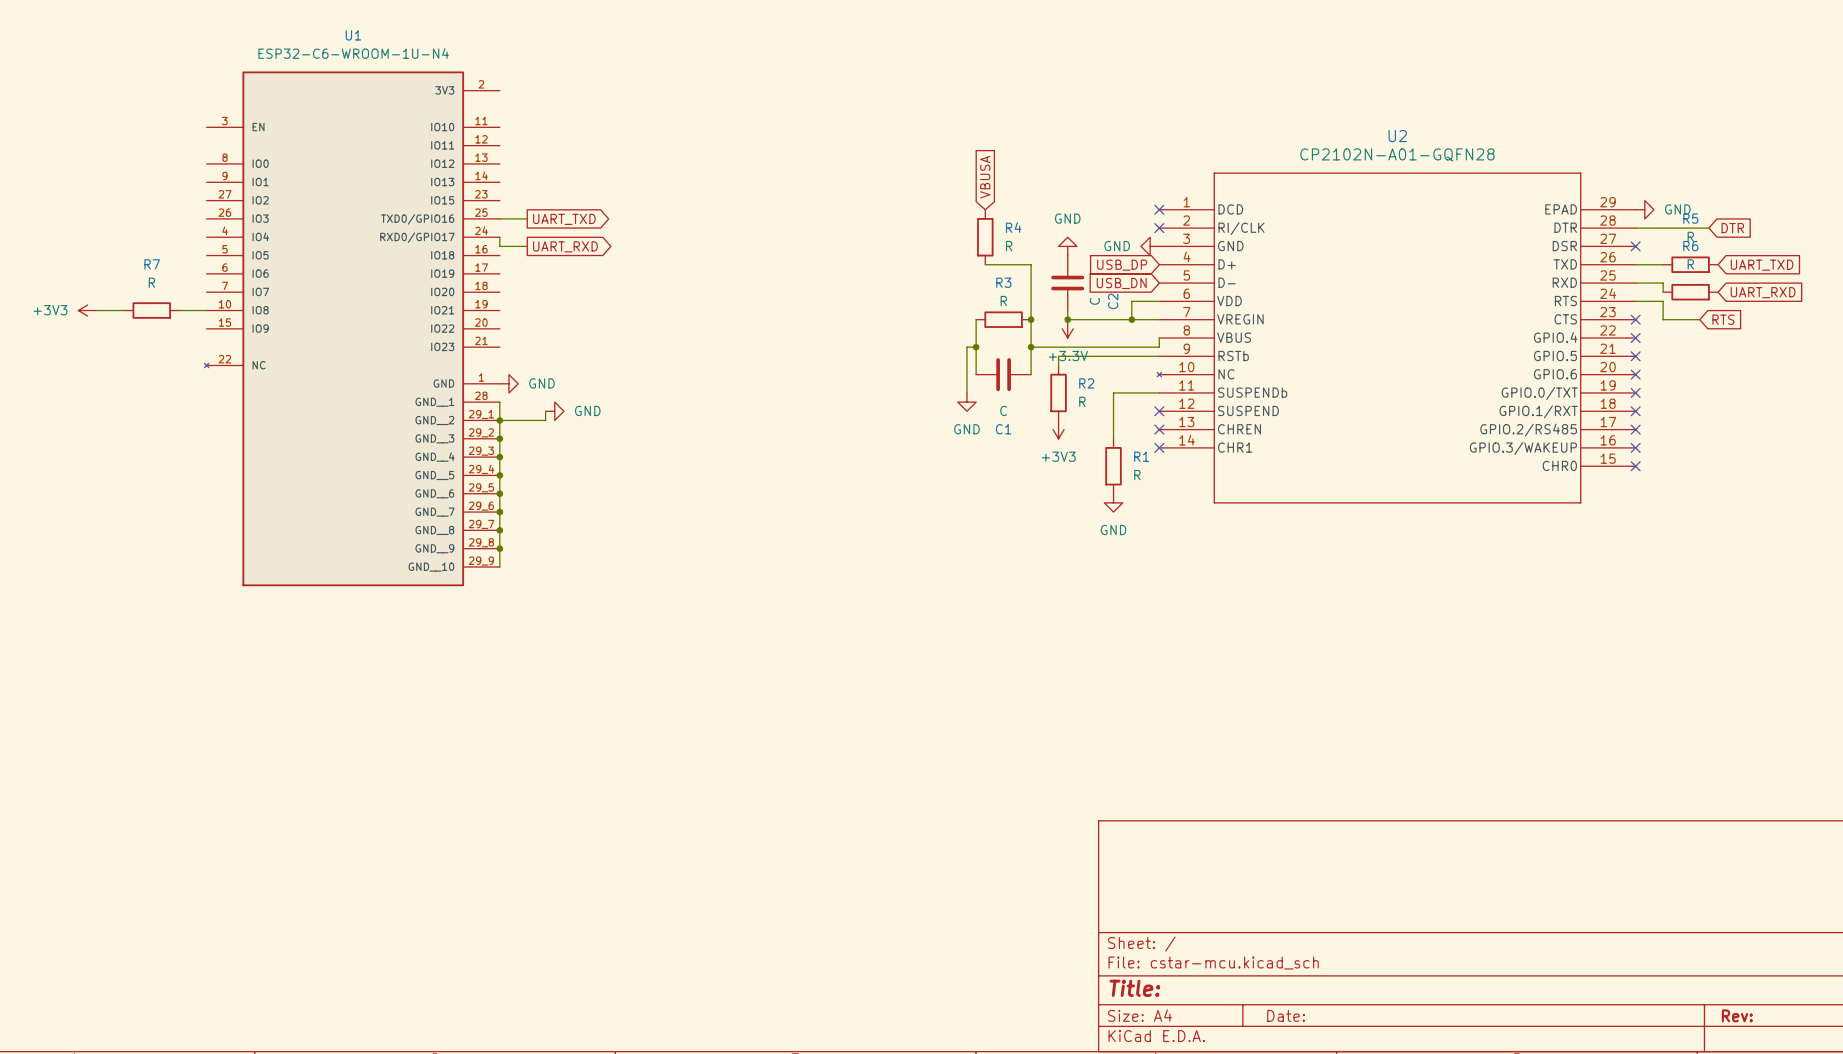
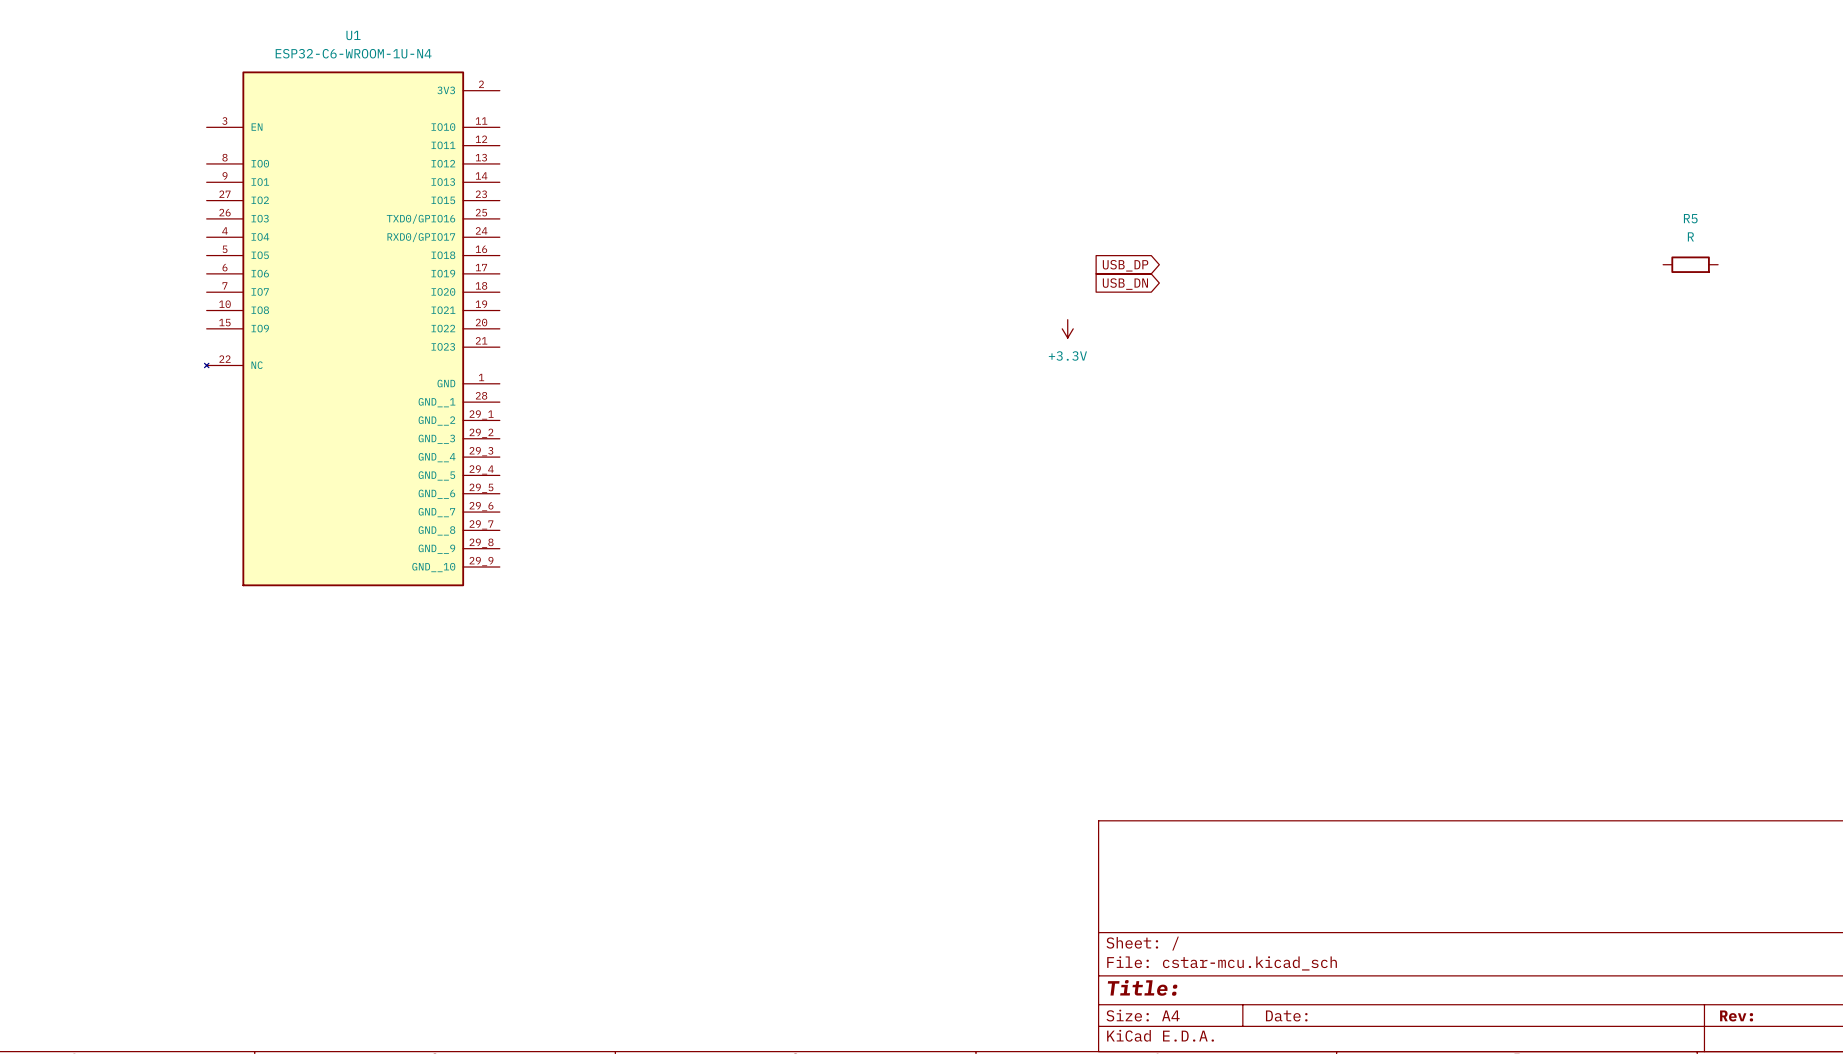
global label: VBUSA (985, 177) -> none
no-connect mark: (1159, 209) -> none
power symbol: GND (1644, 209) -> none
wire: (499, 218) (527, 218) -> none
global label: UART_TXD (564, 219) -> none
no-connect mark: (1159, 228) -> none
wire: (1635, 228) (1708, 228) -> none
global label: DTR (1732, 228) -> none
wire: (499, 237) (499, 246) (527, 246) -> none
R4: R (985, 237) -> none
global label: UART_RXD (565, 246) -> none
power symbol: GND (1067, 246) -> none
power symbol: GND (1150, 246) -> none
no-connect mark: (1635, 246) -> none
wire: (985, 264) (1031, 264) (1031, 374) -> none
wire: (1635, 264) (1663, 264) -> none
global label: UART_TXD (1762, 265) -> none
C2: C (1067, 283) -> none
wire: (1635, 283) (1663, 283) (1663, 292) -> none
R6: R (1690, 292) -> none
global label: UART_RXD (1763, 292) -> none
wire: (1159, 301) (1131, 301) (1131, 319) -> none
wire: (1635, 301) (1663, 301) (1663, 319) (1699, 319) -> none
power symbol: +3V3 (87, 310) -> none
wire: (96, 310) (124, 310) -> none
R7: R (151, 310) -> none
wire: (179, 310) (206, 310) -> none
wire: (1067, 310) (1067, 319) (1159, 319) -> none
wire: (976, 319) (976, 374) -> none
R3: R (1003, 319) -> none
junction: (1031, 319) -> none
junction: (1067, 319) -> none
junction: (1131, 319) -> none
no-connect mark: (1635, 319) -> none
global label: RTS (1723, 319) -> none
wire: (1159, 338) (1159, 347) (1031, 347) -> none
U2: CP2102N-A01-GQFN28 (1396, 338) -> none
no-connect mark: (1635, 338) -> none
wire: (976, 347) (966, 347) (966, 392) -> none
junction: (976, 347) -> none
junction: (1031, 347) -> none
wire: (1159, 356) (1058, 356) (1058, 365) -> none
no-connect mark: (1635, 356) -> none
C1: C (1003, 374) -> none
no-connect mark: (1635, 374) -> none
power symbol: GND (508, 383) -> none
R2: R (1058, 392) -> none
wire: (1159, 392) (1113, 392) (1113, 438) -> none
no-connect mark: (1635, 392) -> none
wire: (499, 402) (499, 567) -> none
power symbol: GND (966, 402) -> none
wire: (545, 411) (545, 420) (499, 420) -> none
power symbol: GND (554, 411) -> none
no-connect mark: (1159, 411) -> none
no-connect mark: (1635, 411) -> none
junction: (499, 420) -> none
power symbol: +3V3 (1058, 429) -> none
no-connect mark: (1159, 429) -> none
no-connect mark: (1635, 429) -> none
junction: (499, 438) -> none
no-connect mark: (1159, 447) -> none
no-connect mark: (1635, 447) -> none
junction: (499, 457) -> none
R1: R (1113, 466) -> none
no-connect mark: (1635, 466) -> none
junction: (499, 475) -> none
junction: (499, 493) -> none
power symbol: GND (1113, 502) -> none
junction: (499, 512) -> none
junction: (499, 530) -> none
junction: (499, 548) -> none

